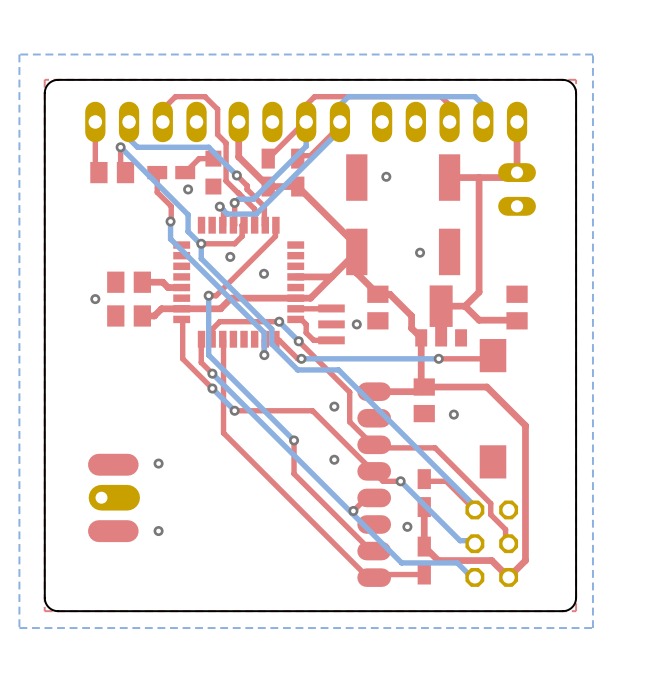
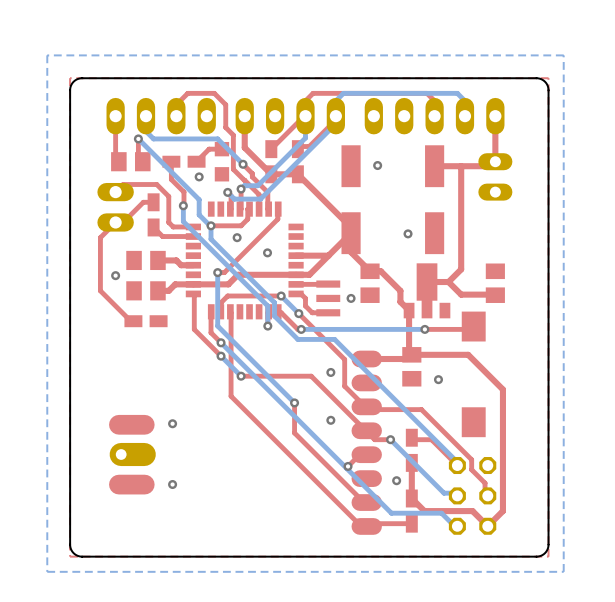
top track: none -> (115, 192) (123, 184) (156, 184) (168, 196) (168, 222) (173, 226) (193, 226)
top track: none -> (153, 202) (143, 202) (123, 222) (115, 222) (100, 237) (100, 290) (130, 321) (133, 321)
part: none -> (115, 207)
part: none -> (153, 214)
top track: none -> (153, 227) (162, 236) (193, 236)
part: none -> (146, 321)

